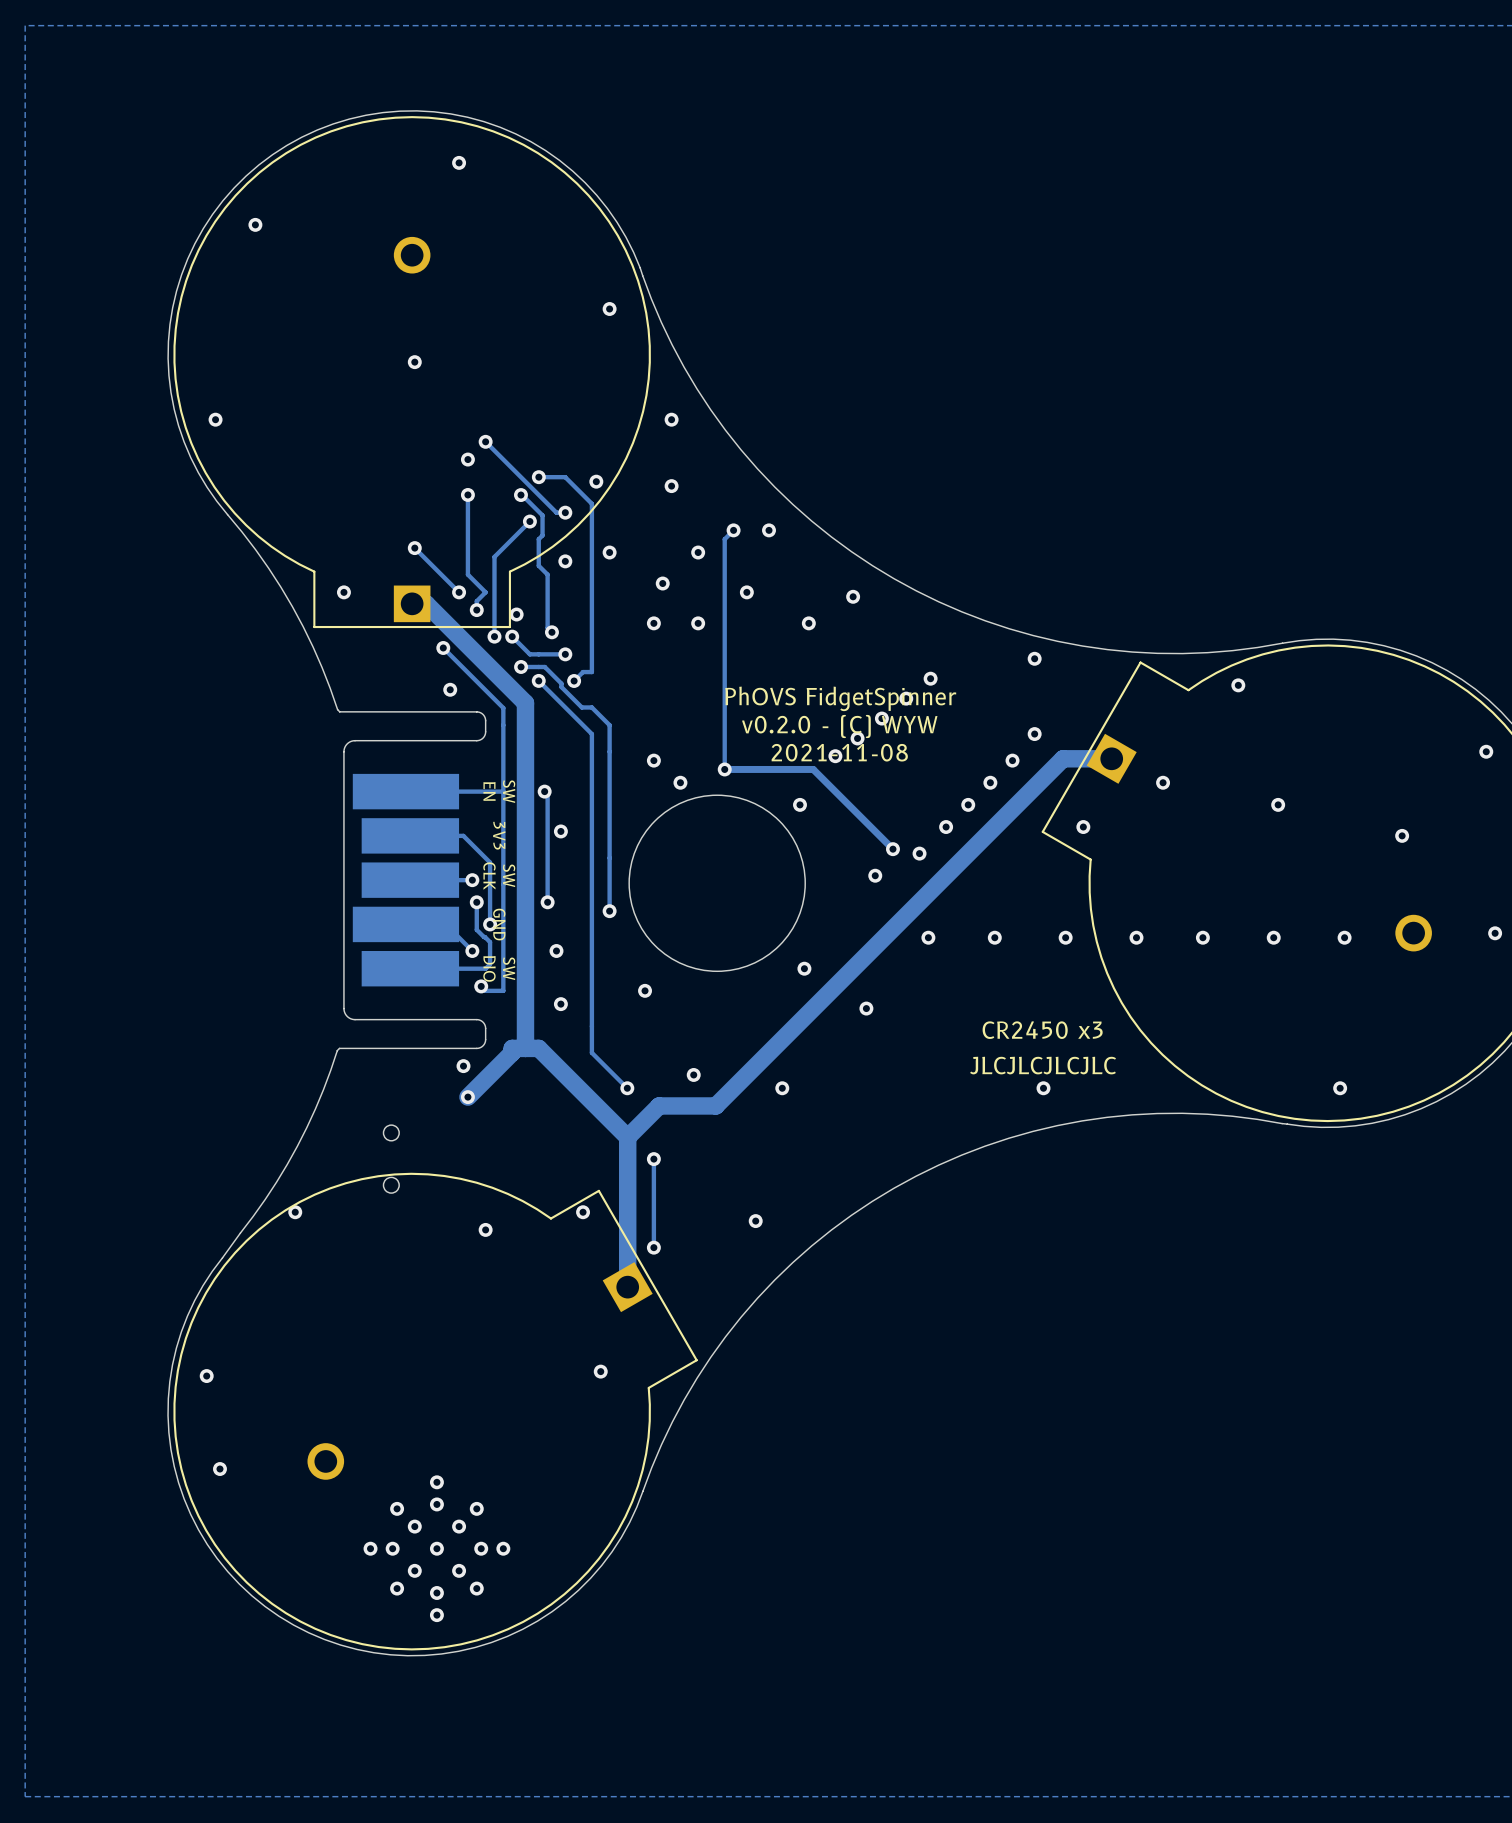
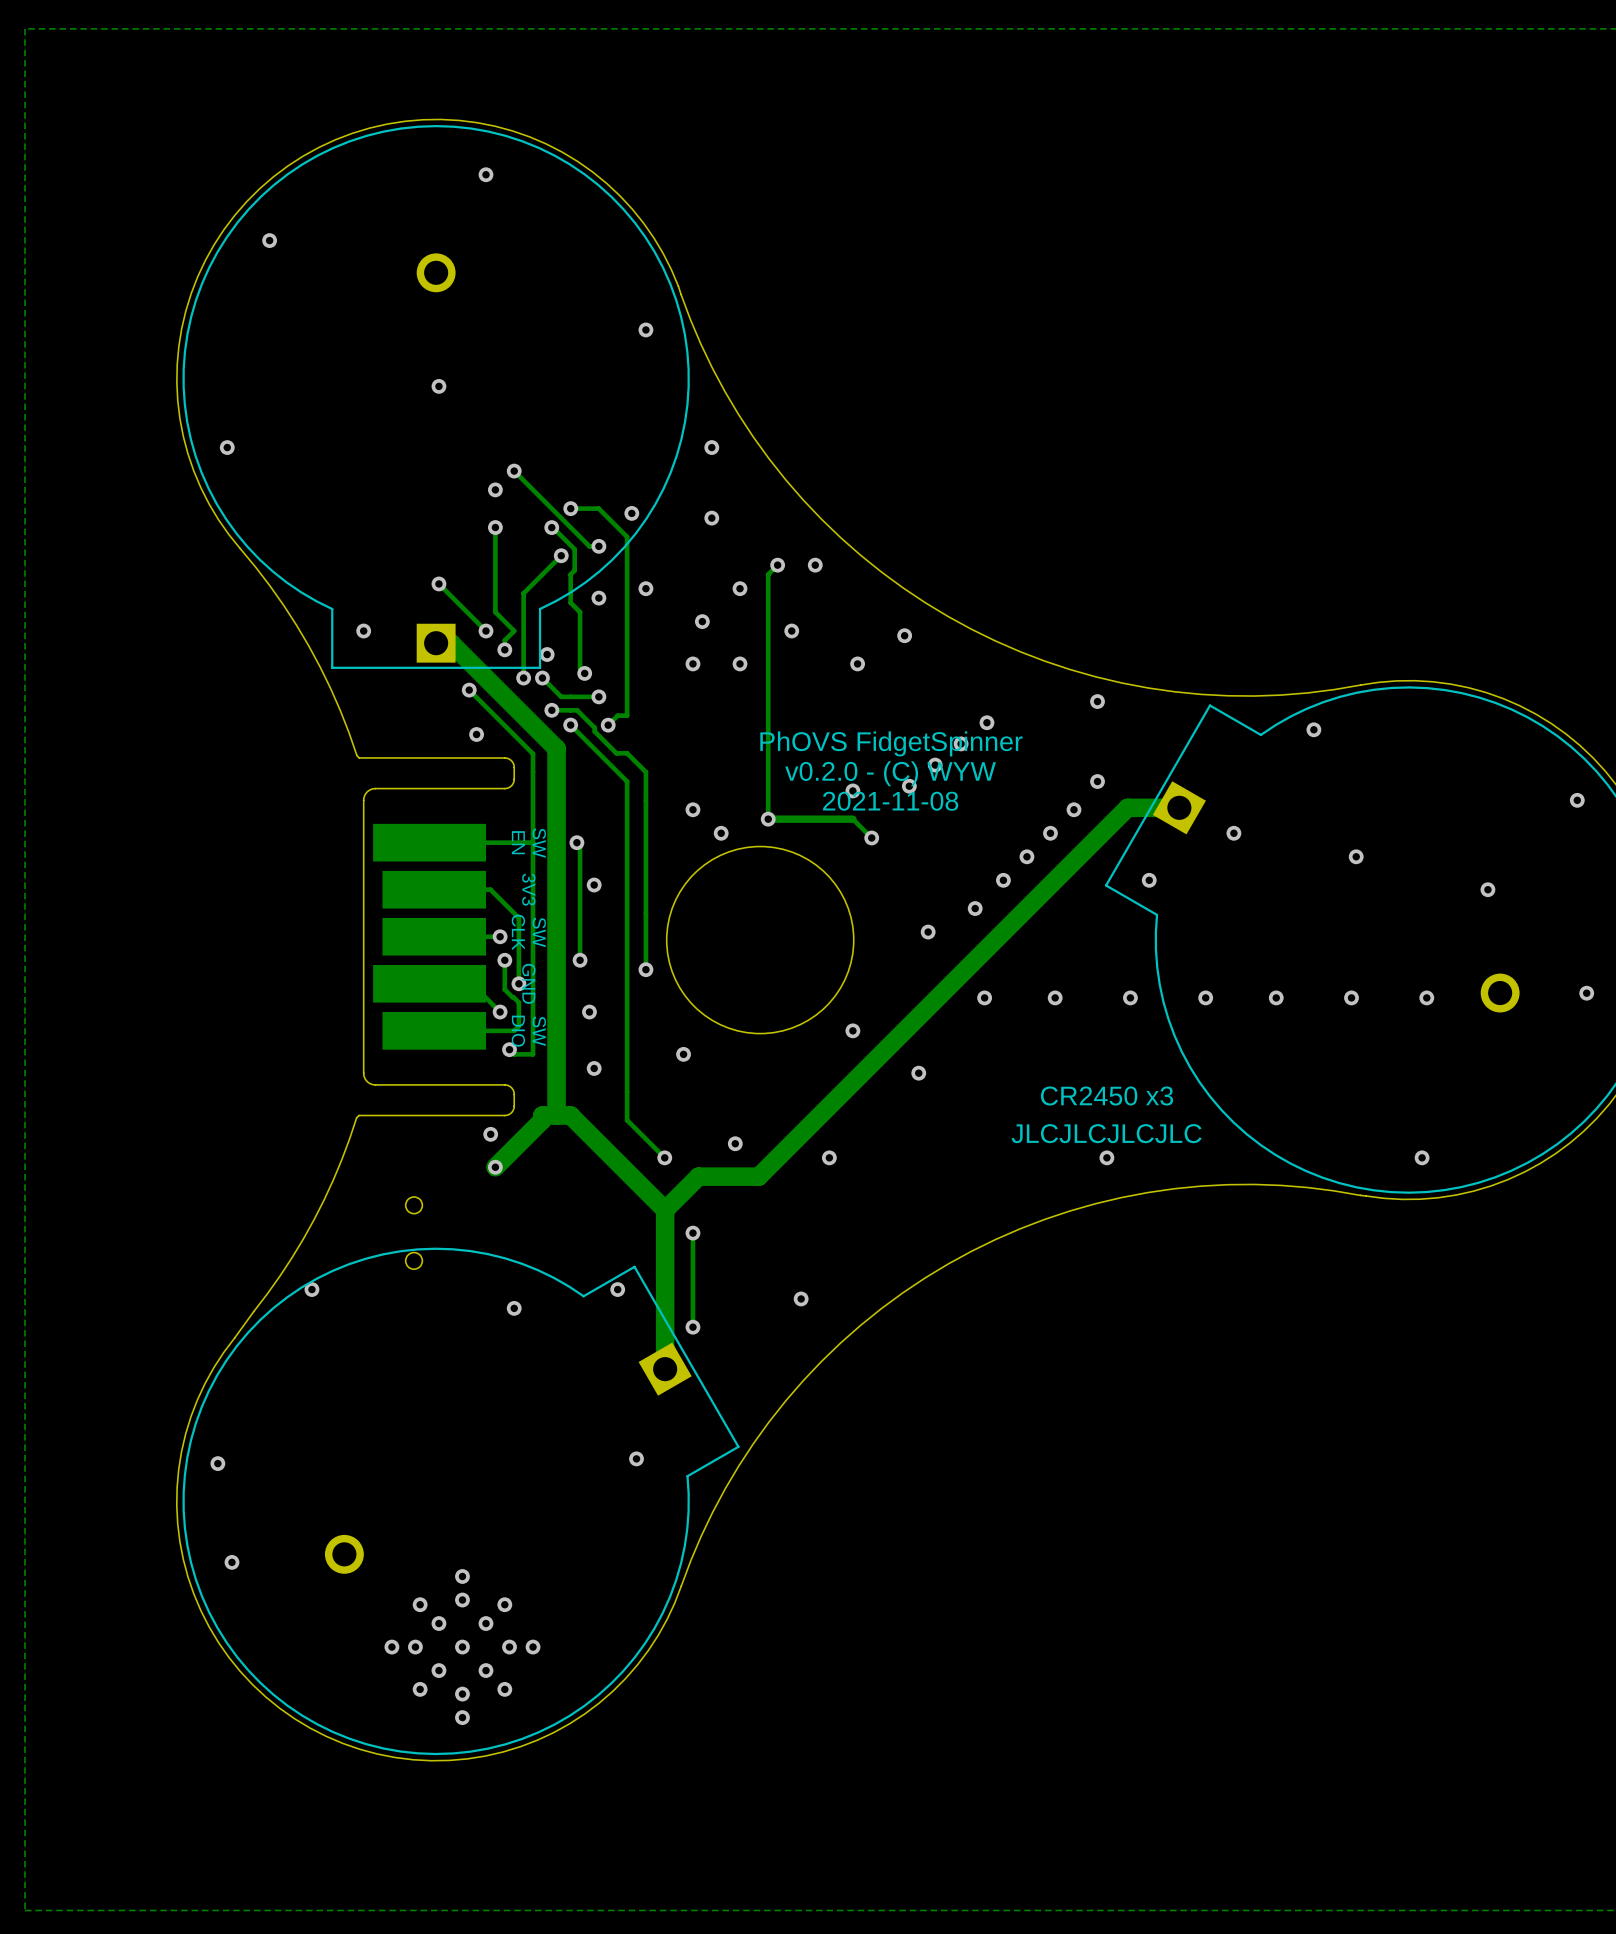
via: none -> (852, 790)
via: (835, 756) -> none
track: (804, 769) (813, 769) (892, 849) -> (852, 819) (871, 837)
via: none -> (871, 837)
via: (799, 804) -> none
via: (892, 849) -> none

